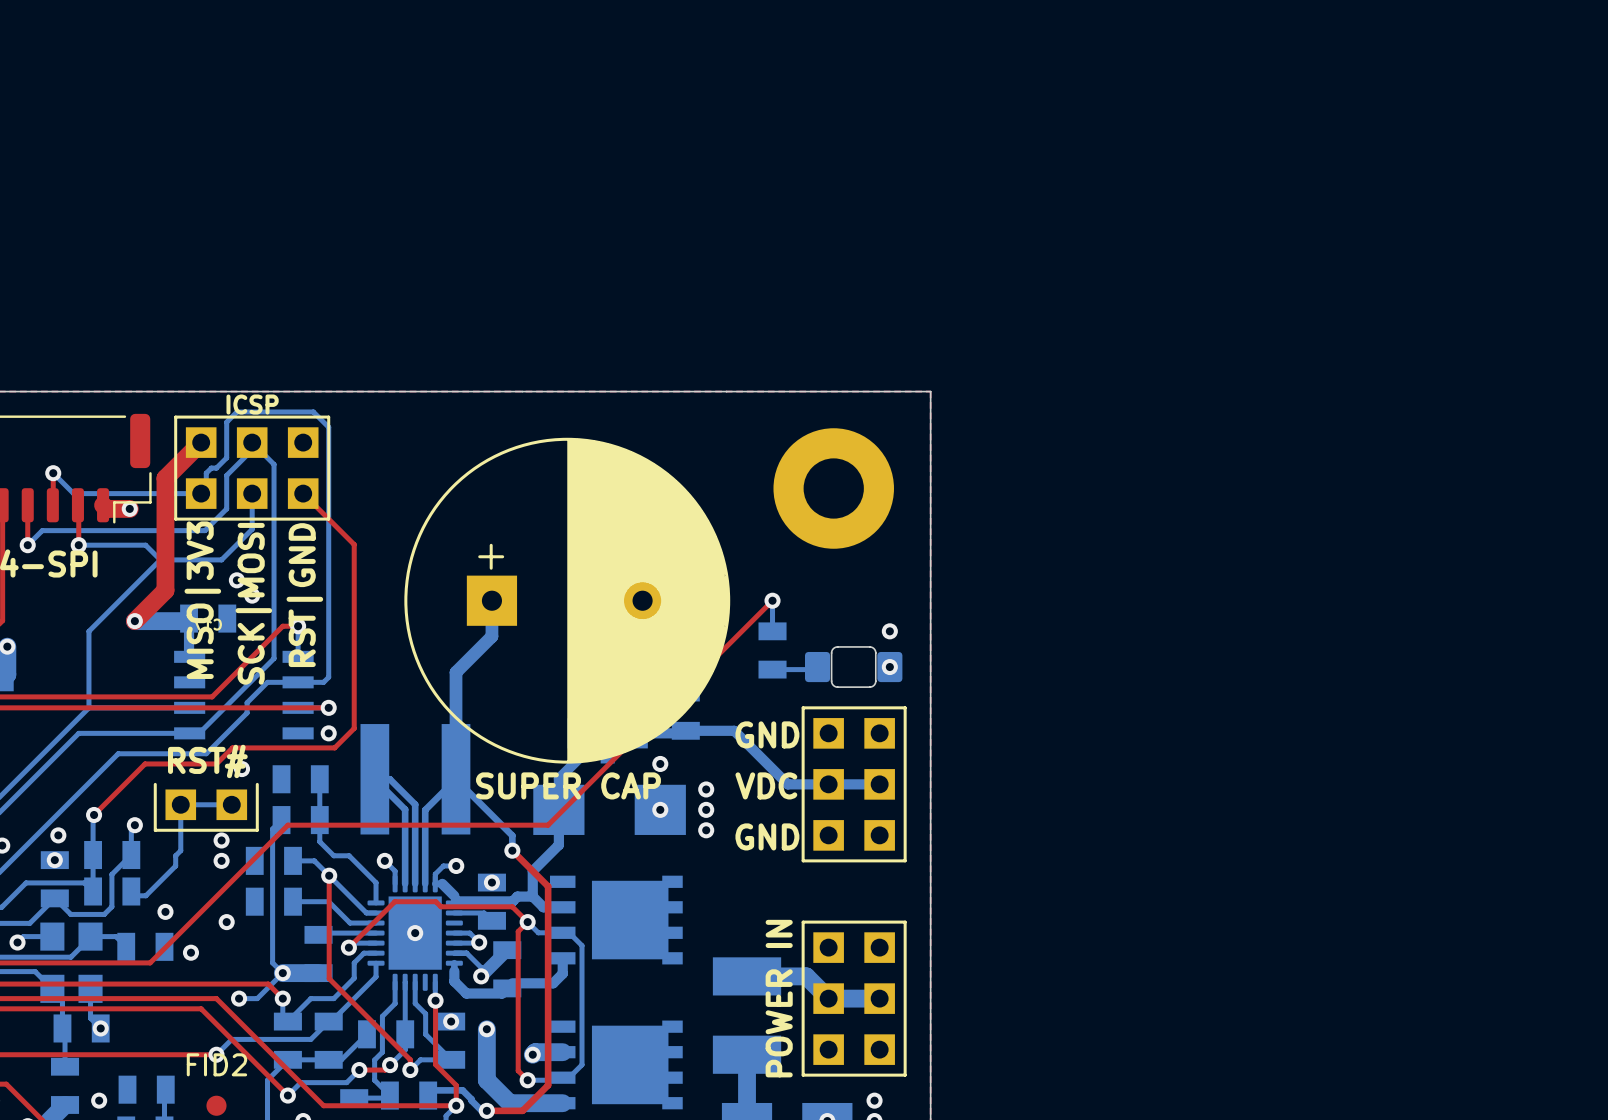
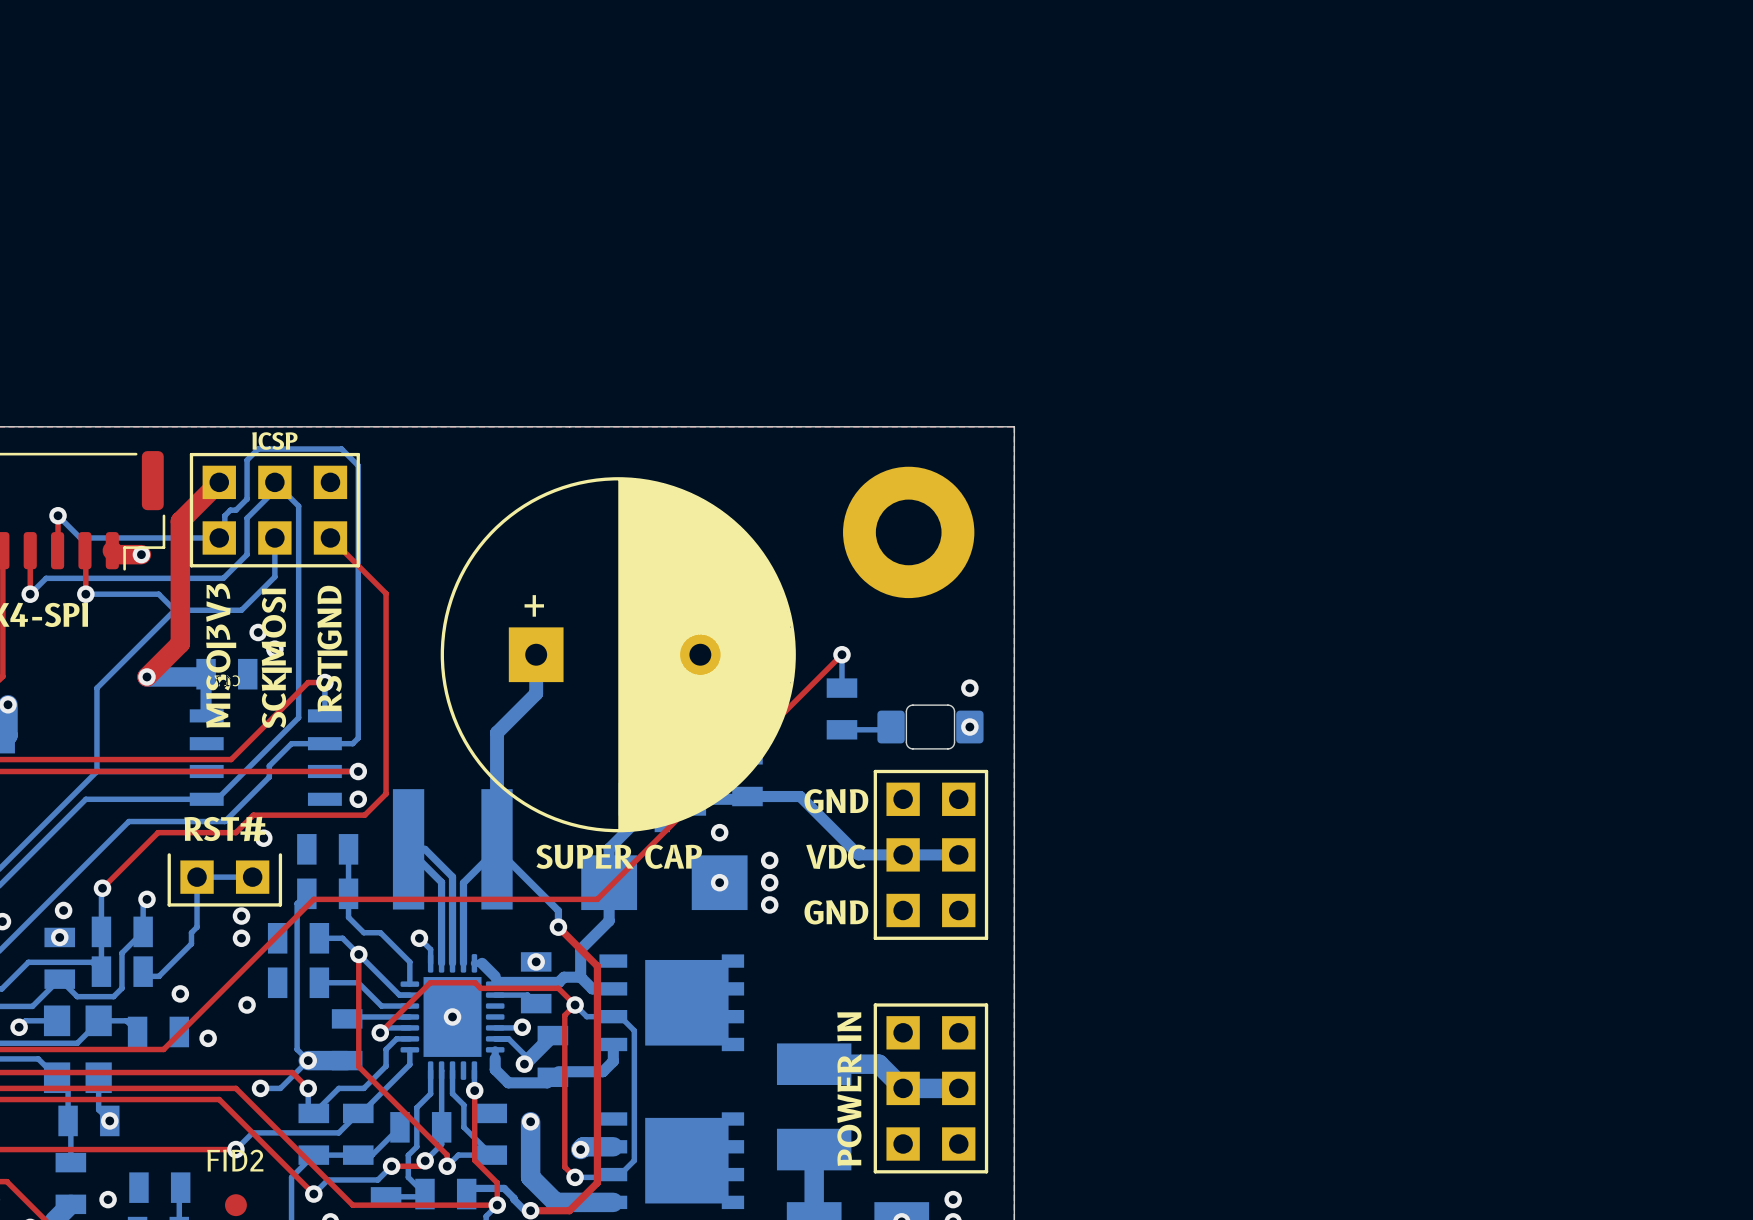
bottom track: (456, 865) (443, 865) (435, 874) (435, 883) -> none
via: (456, 865) -> none
bottom track: (454, 933) (469, 933) (479, 942) -> none
via: (451, 1021) -> none

